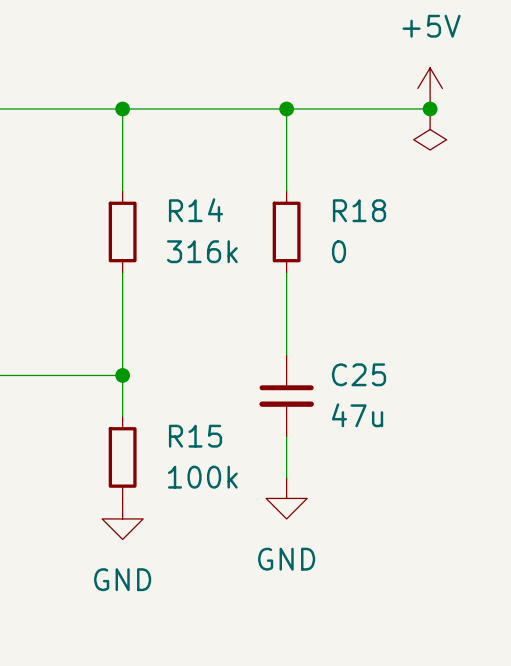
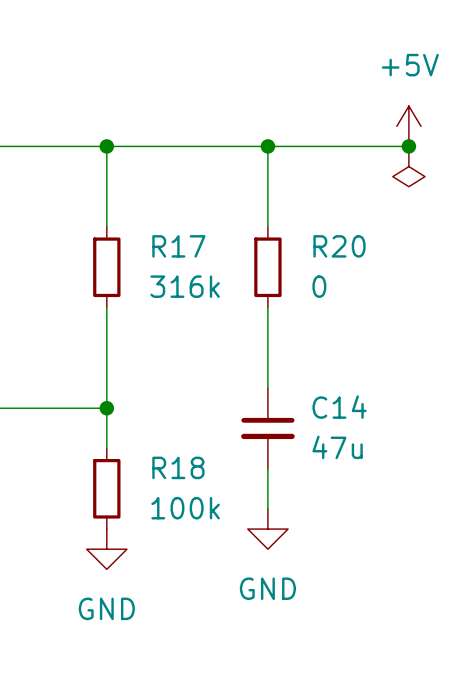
R14 name: R14 (196, 210) -> R17 (178, 246)
R18 name: R18 (359, 210) -> R20 (339, 246)
C25 name: C25 (359, 374) -> C14 (339, 407)
R15 name: R15 (195, 436) -> R18 (178, 467)

